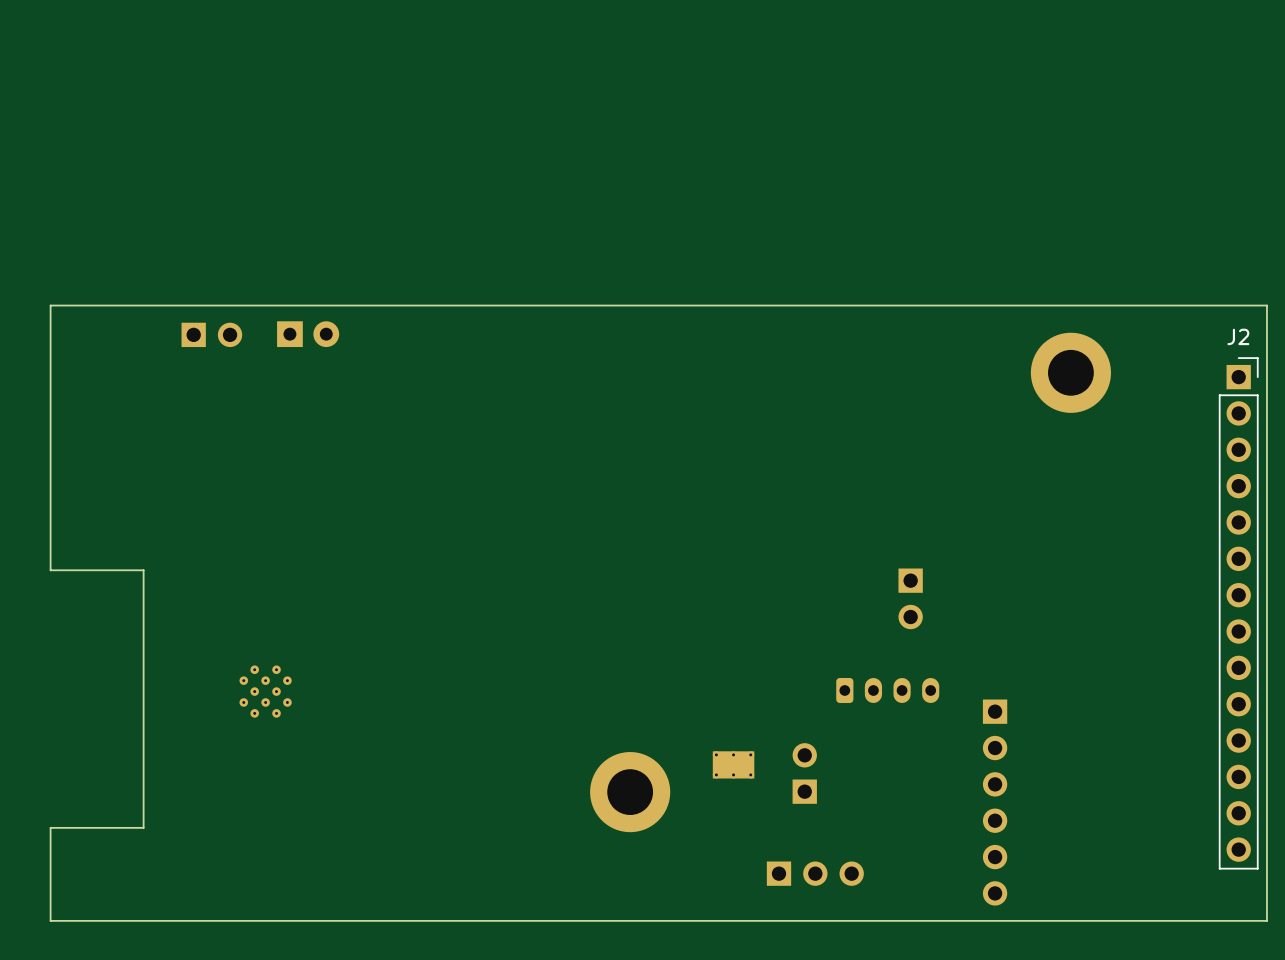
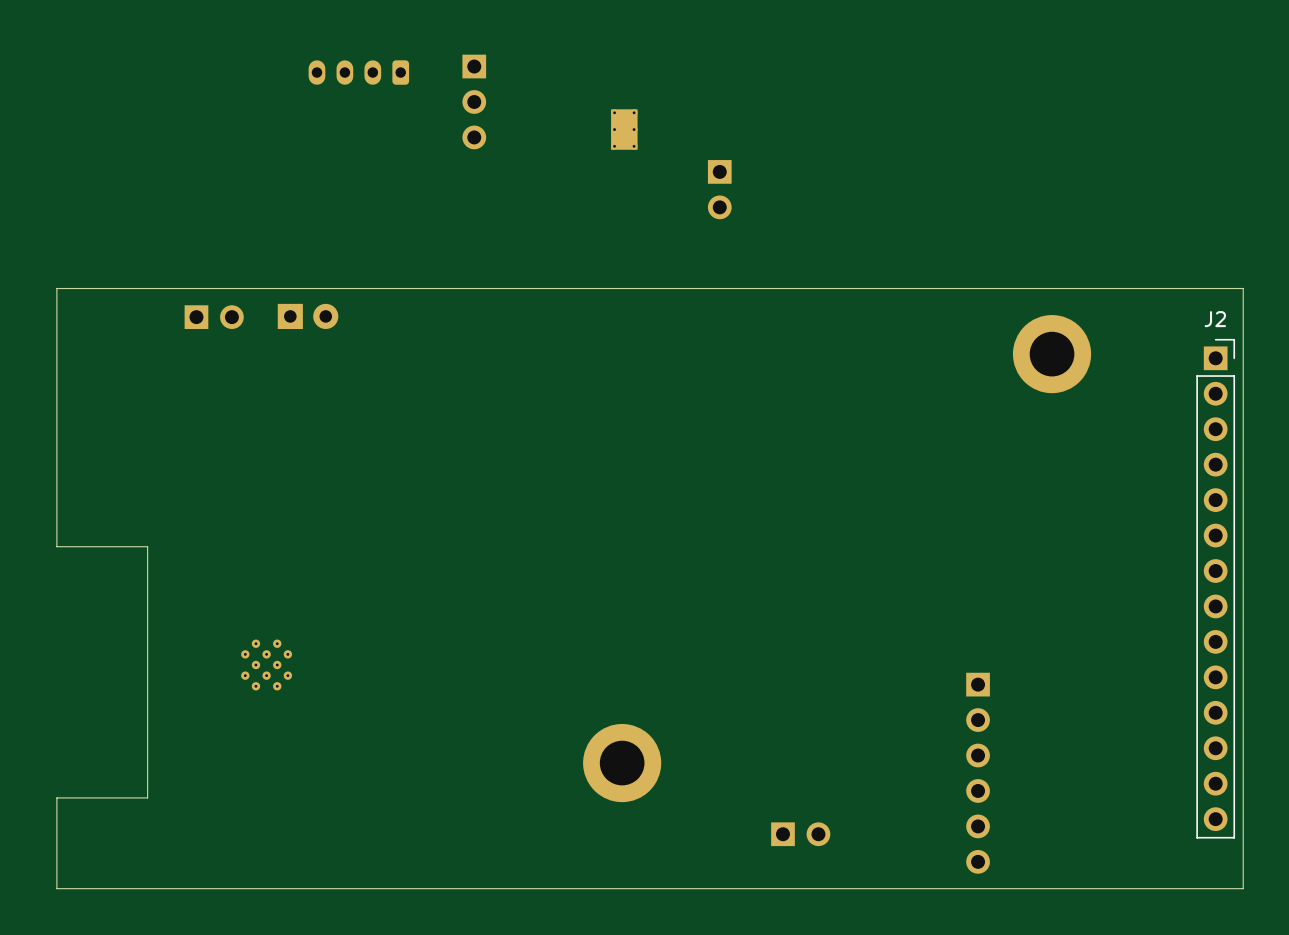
part: none -> (358, 72)
part: none -> (474, 101)
part: none -> (624, 129)
part: none -> (719, 189)
part: (910, 598) -> none
part: (887, 690) -> none
part: (733, 764) -> none
part: (804, 773) -> none
part footprint: [766, 861, 864, 886] -> [771, 822, 831, 847]

